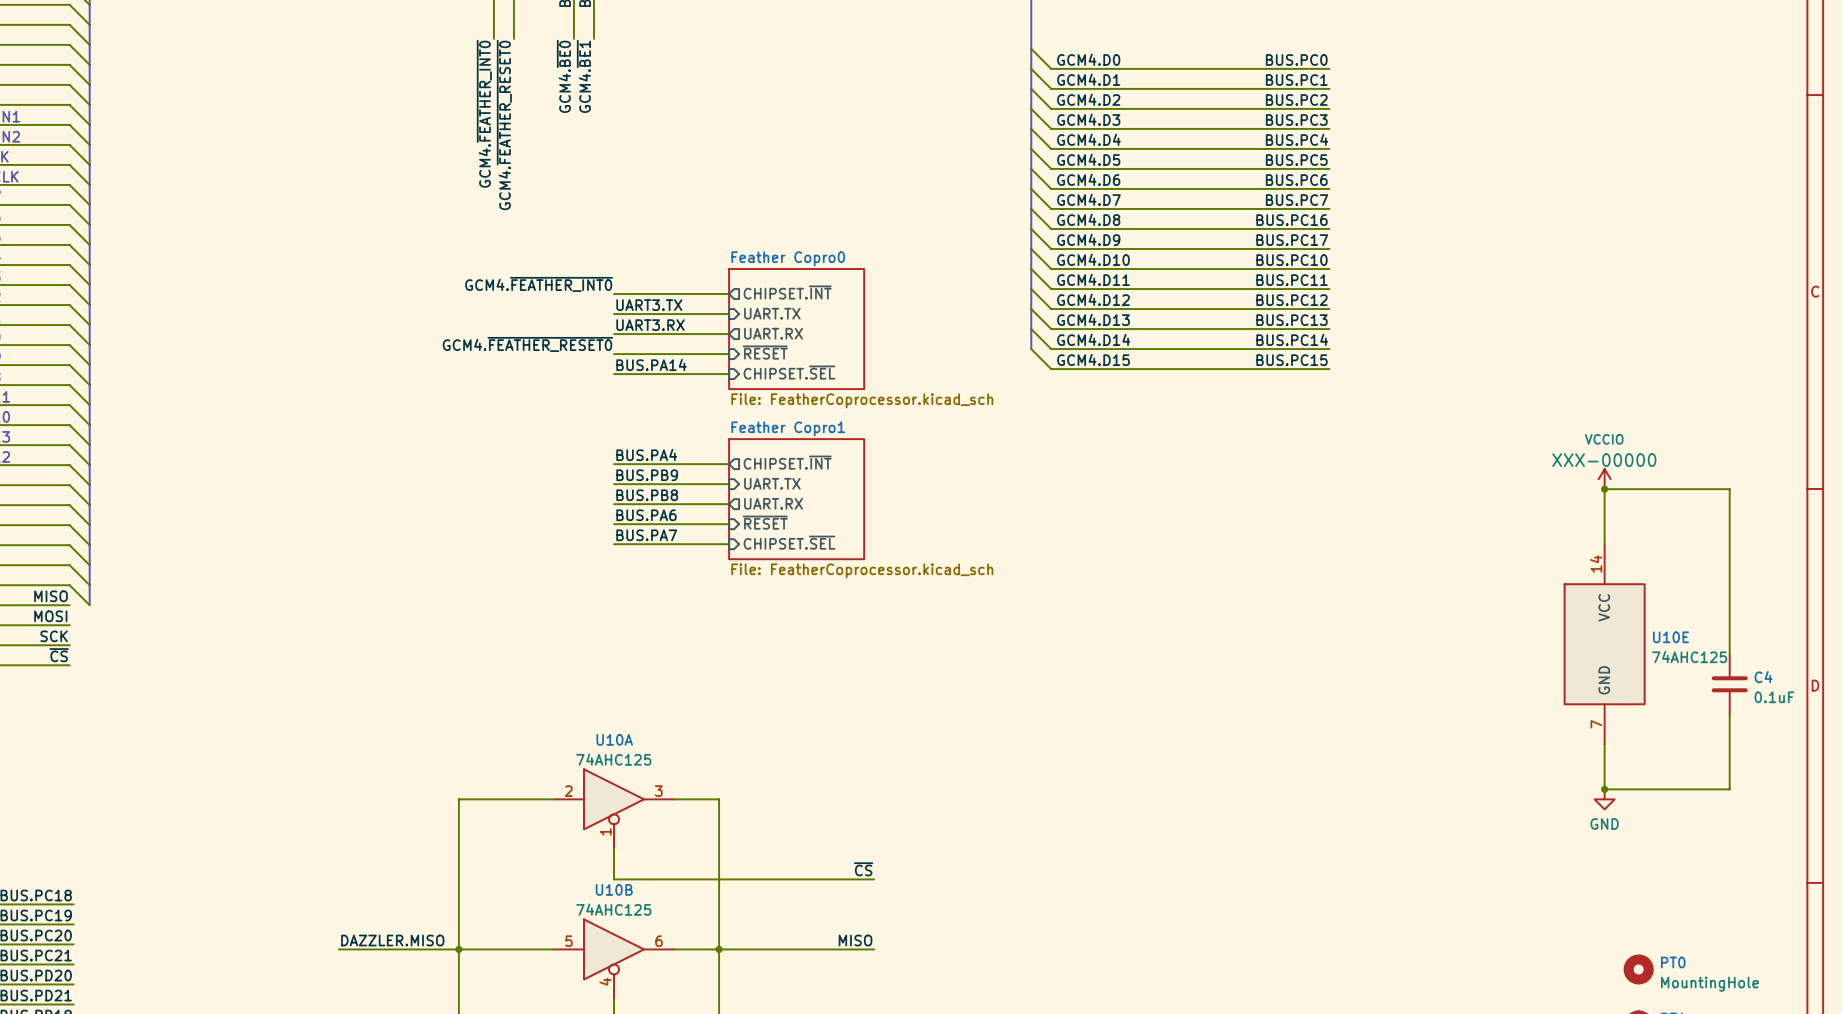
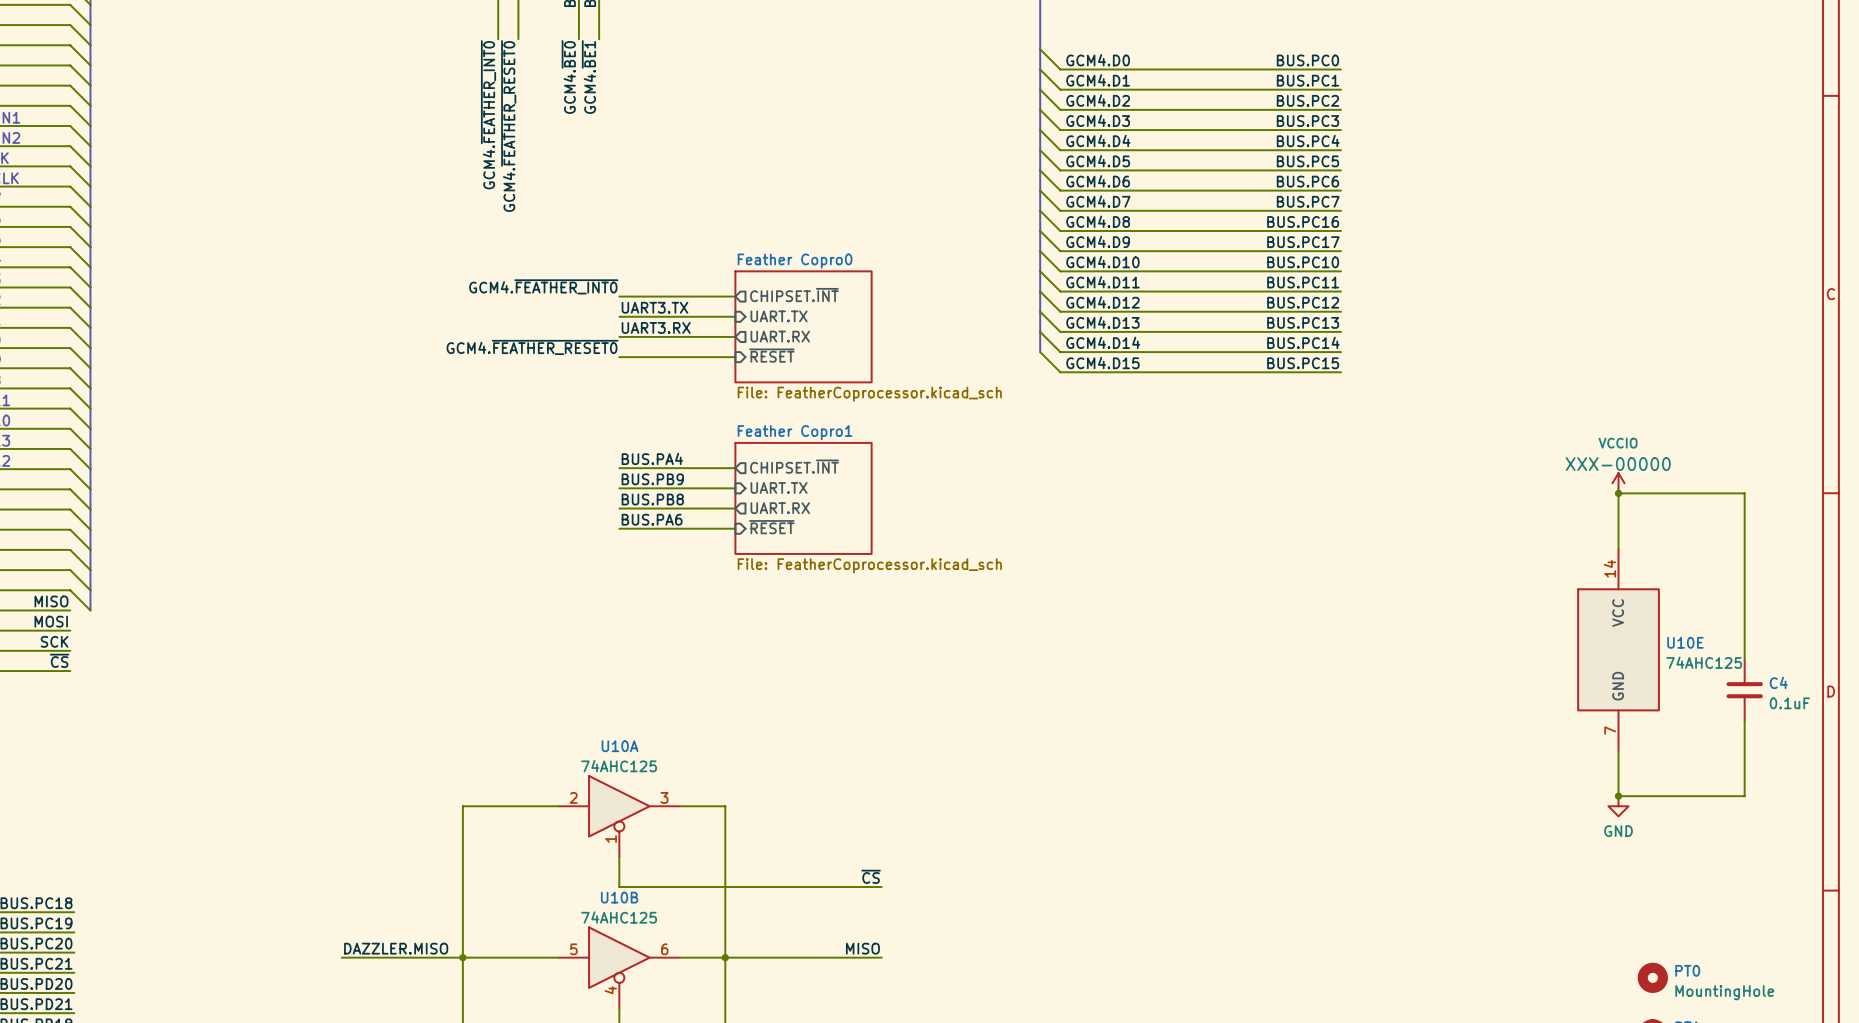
sheet Feather Copro0 shape: [728, 268, 865, 390] -> [734, 270, 873, 383]
label: BUS.PA14 (651, 364) -> none
sheet pin: CHIPSET.~{SEL} (789, 372) -> none
wire: (614, 374) (729, 374) -> none
sheet Feather Copro1 shape: [728, 438, 865, 560] -> [734, 442, 873, 555]
label: BUS.PA7 (646, 535) -> none
sheet pin: CHIPSET.~{SEL} (789, 542) -> none
wire: (614, 544) (729, 544) -> none

